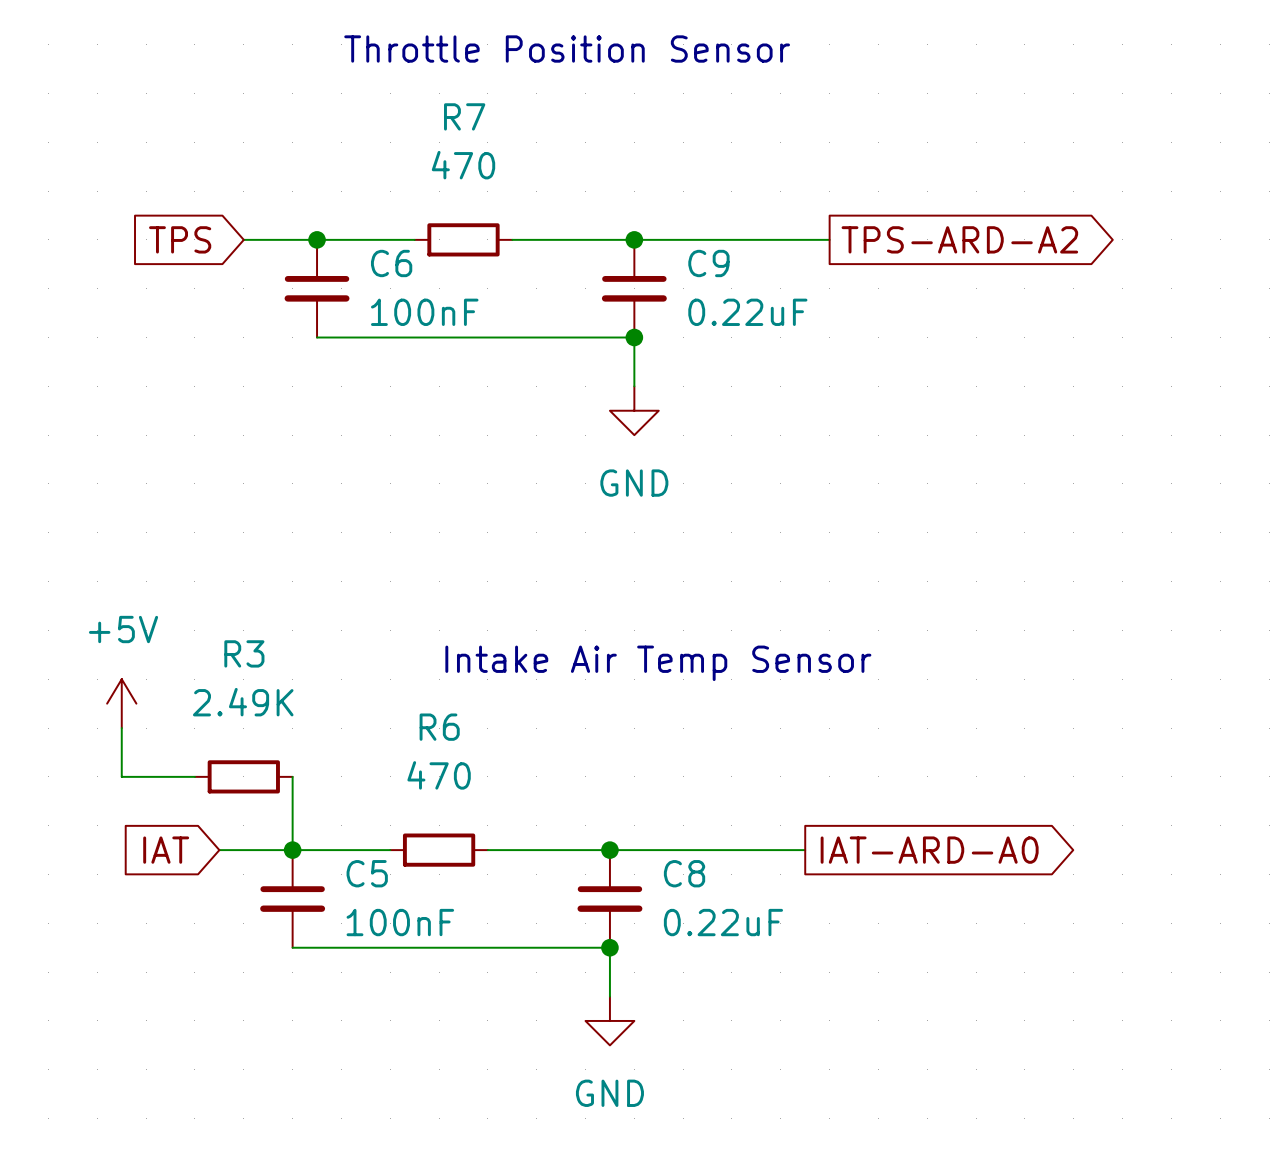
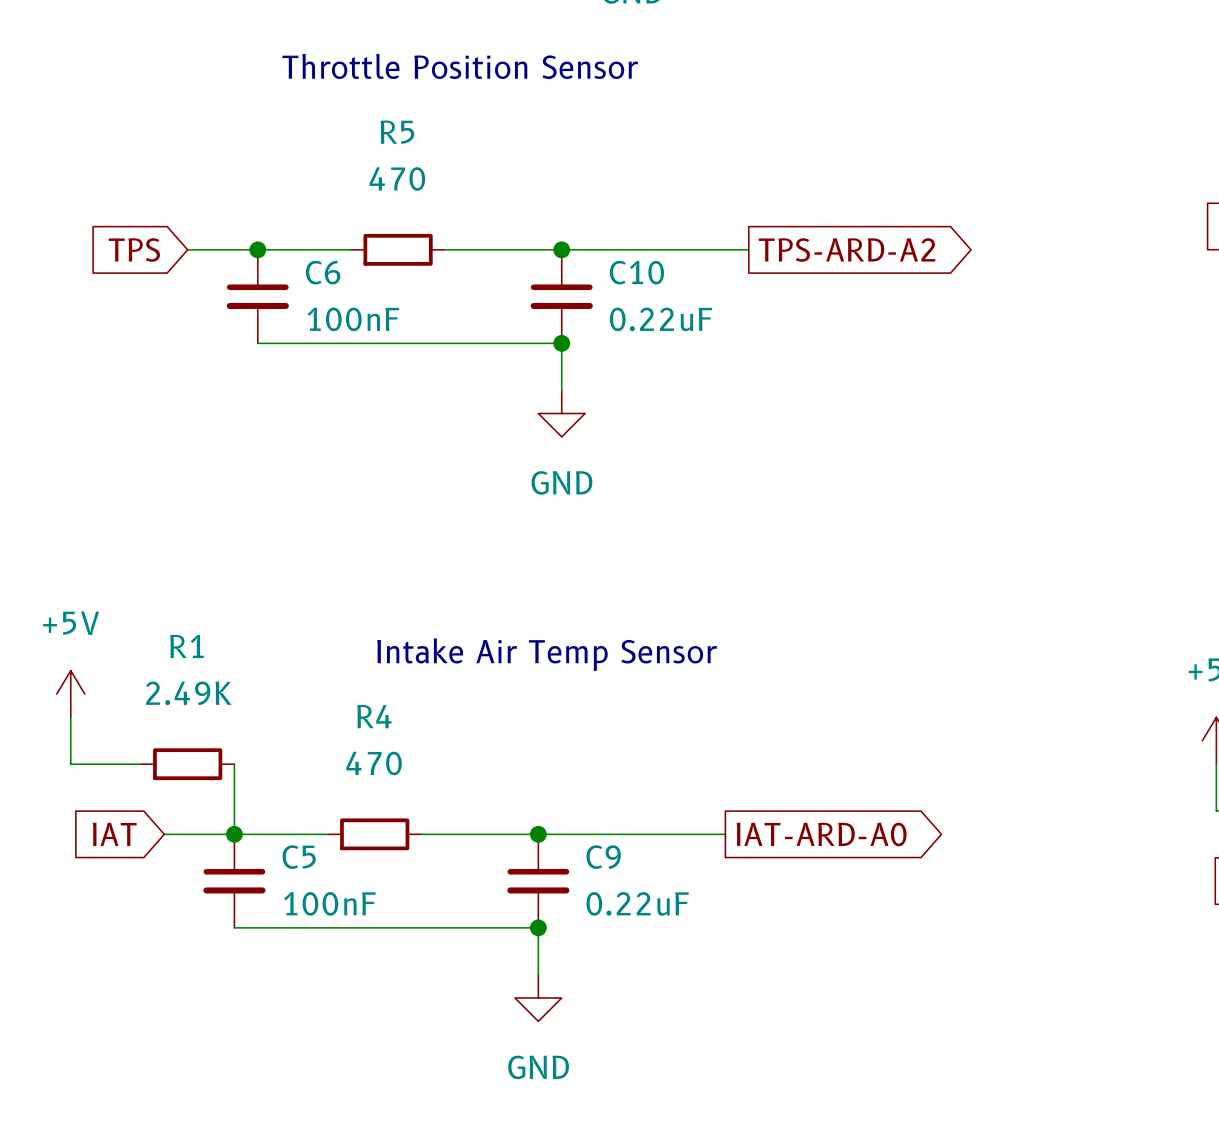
R7 name: R7 (464, 116) -> R5 (397, 132)
C9 name: C9 (708, 263) -> C10 (636, 272)
R3 name: R3 (244, 653) -> R1 (186, 646)
R6 name: R6 (439, 727) -> R4 (374, 716)
C8 name: C8 (684, 873) -> C9 (603, 857)

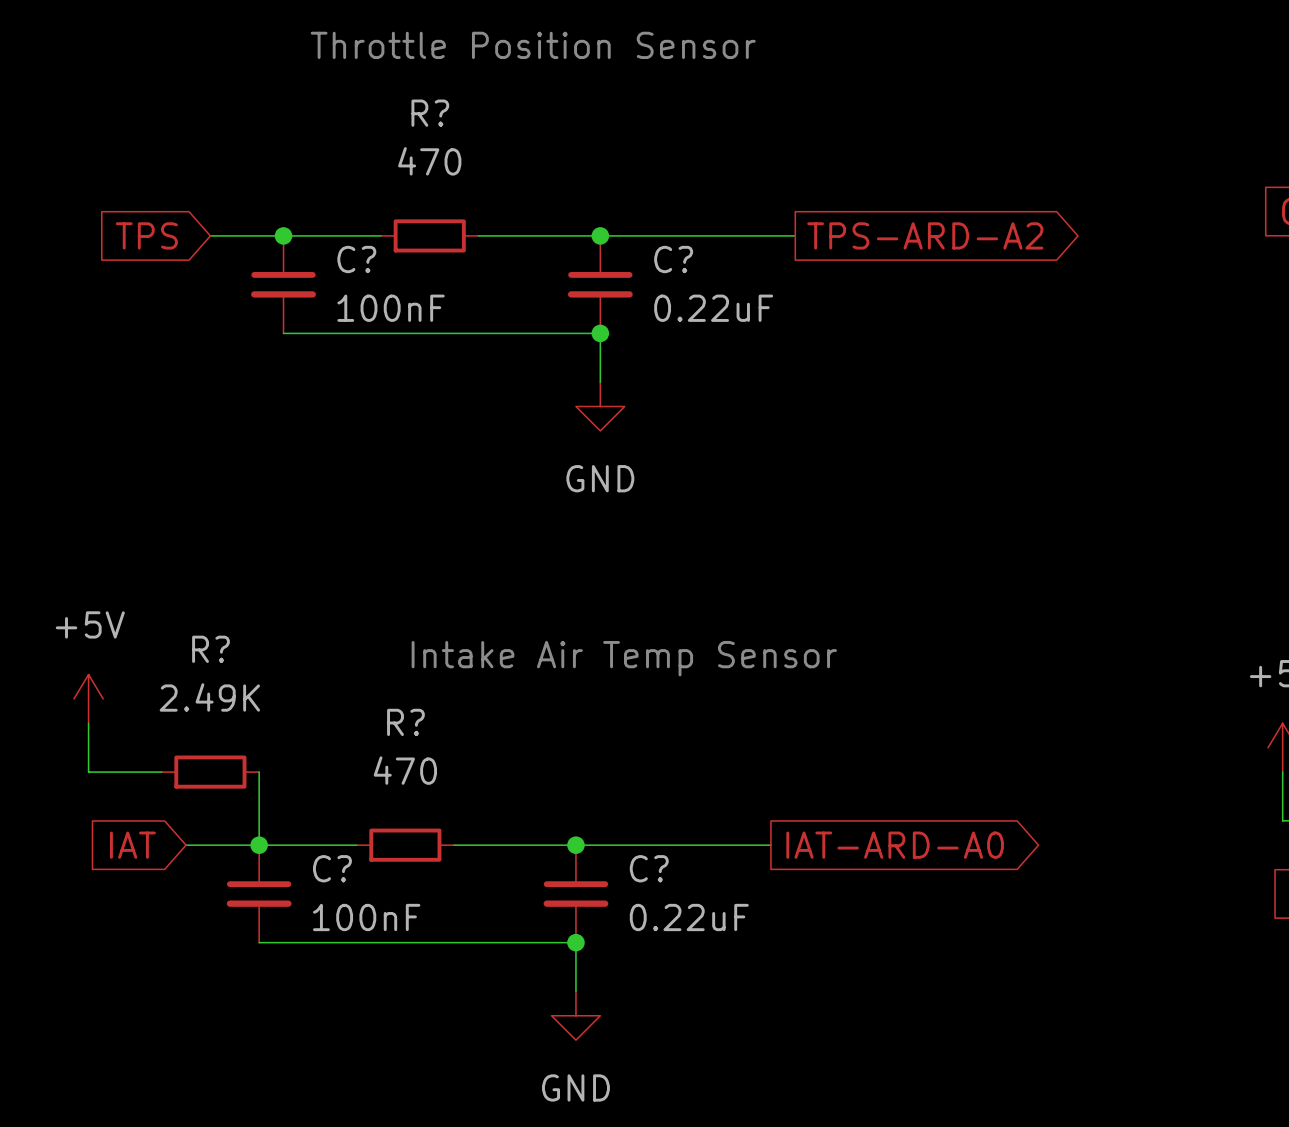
R5 name: R5 (397, 132) -> R? (430, 113)
C6 name: C6 (323, 272) -> C? (356, 259)
C10 name: C10 (636, 272) -> C? (673, 259)
R1 name: R1 (186, 646) -> R? (210, 649)
R4 name: R4 (374, 716) -> R? (405, 722)
C5 name: C5 (299, 857) -> C? (332, 868)
C9 name: C9 (603, 857) -> C? (649, 868)

